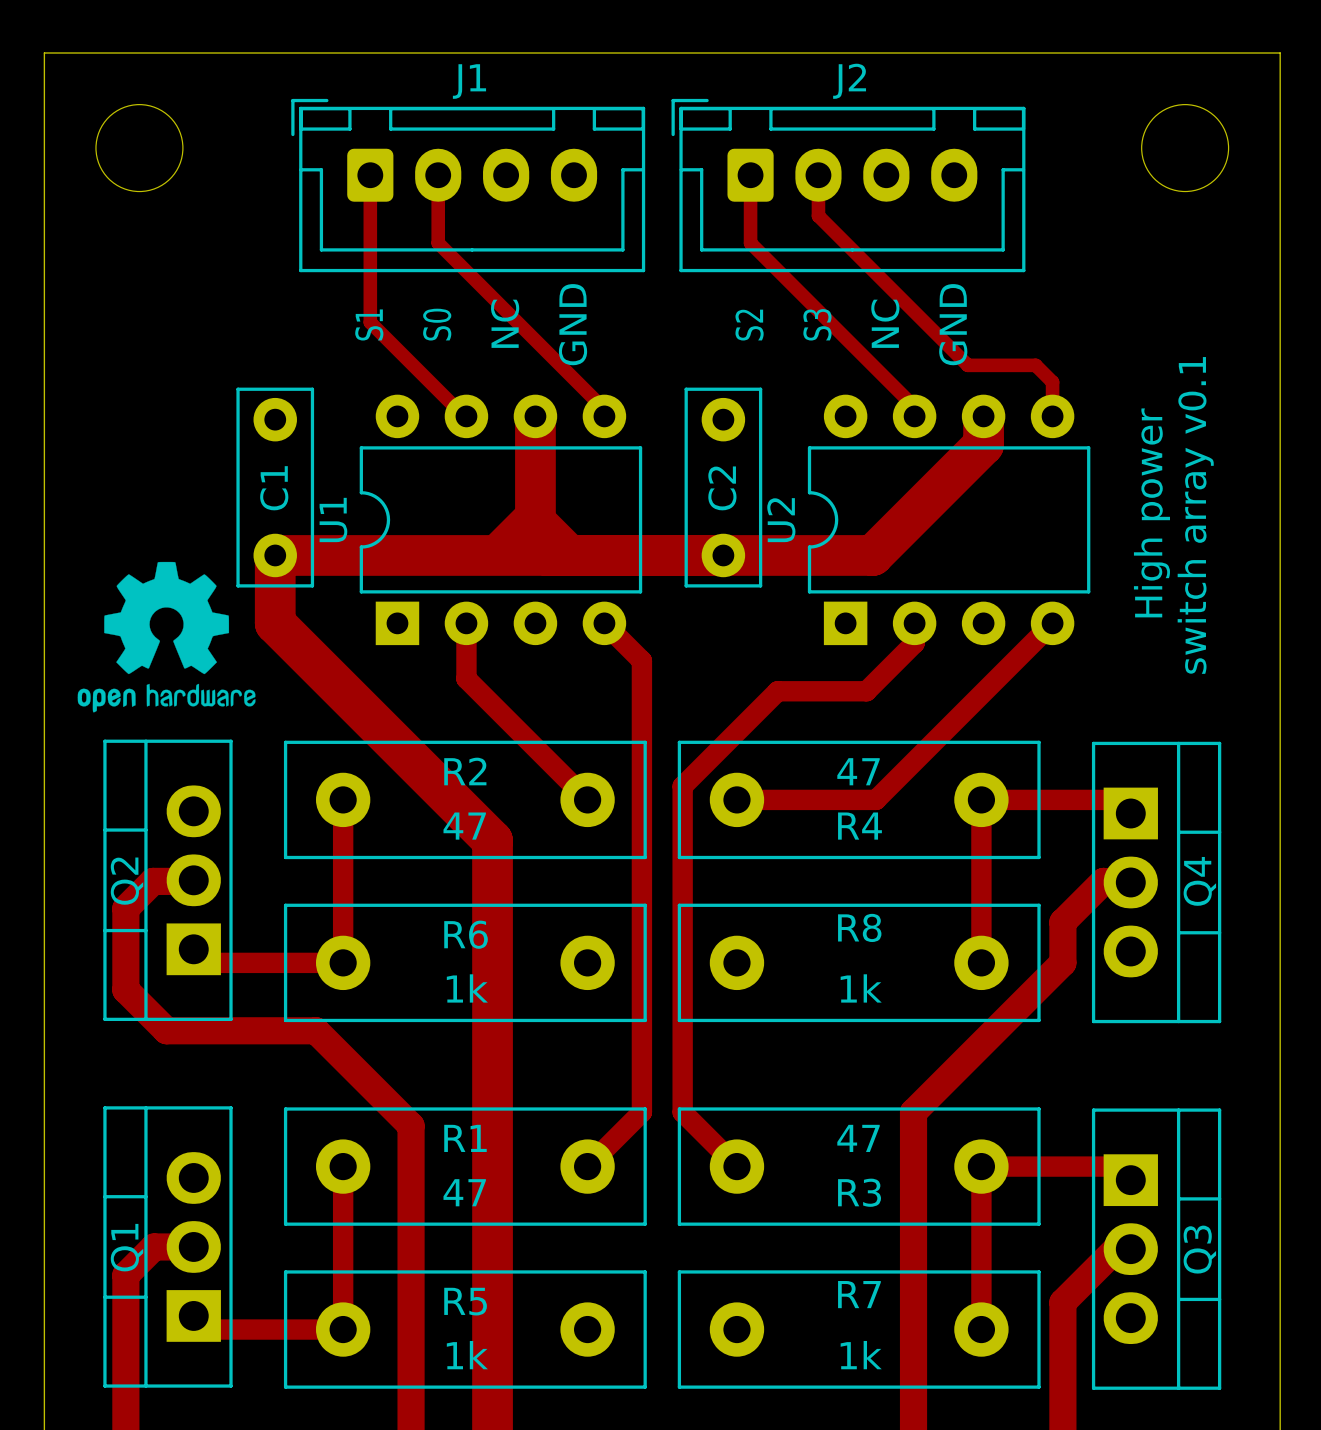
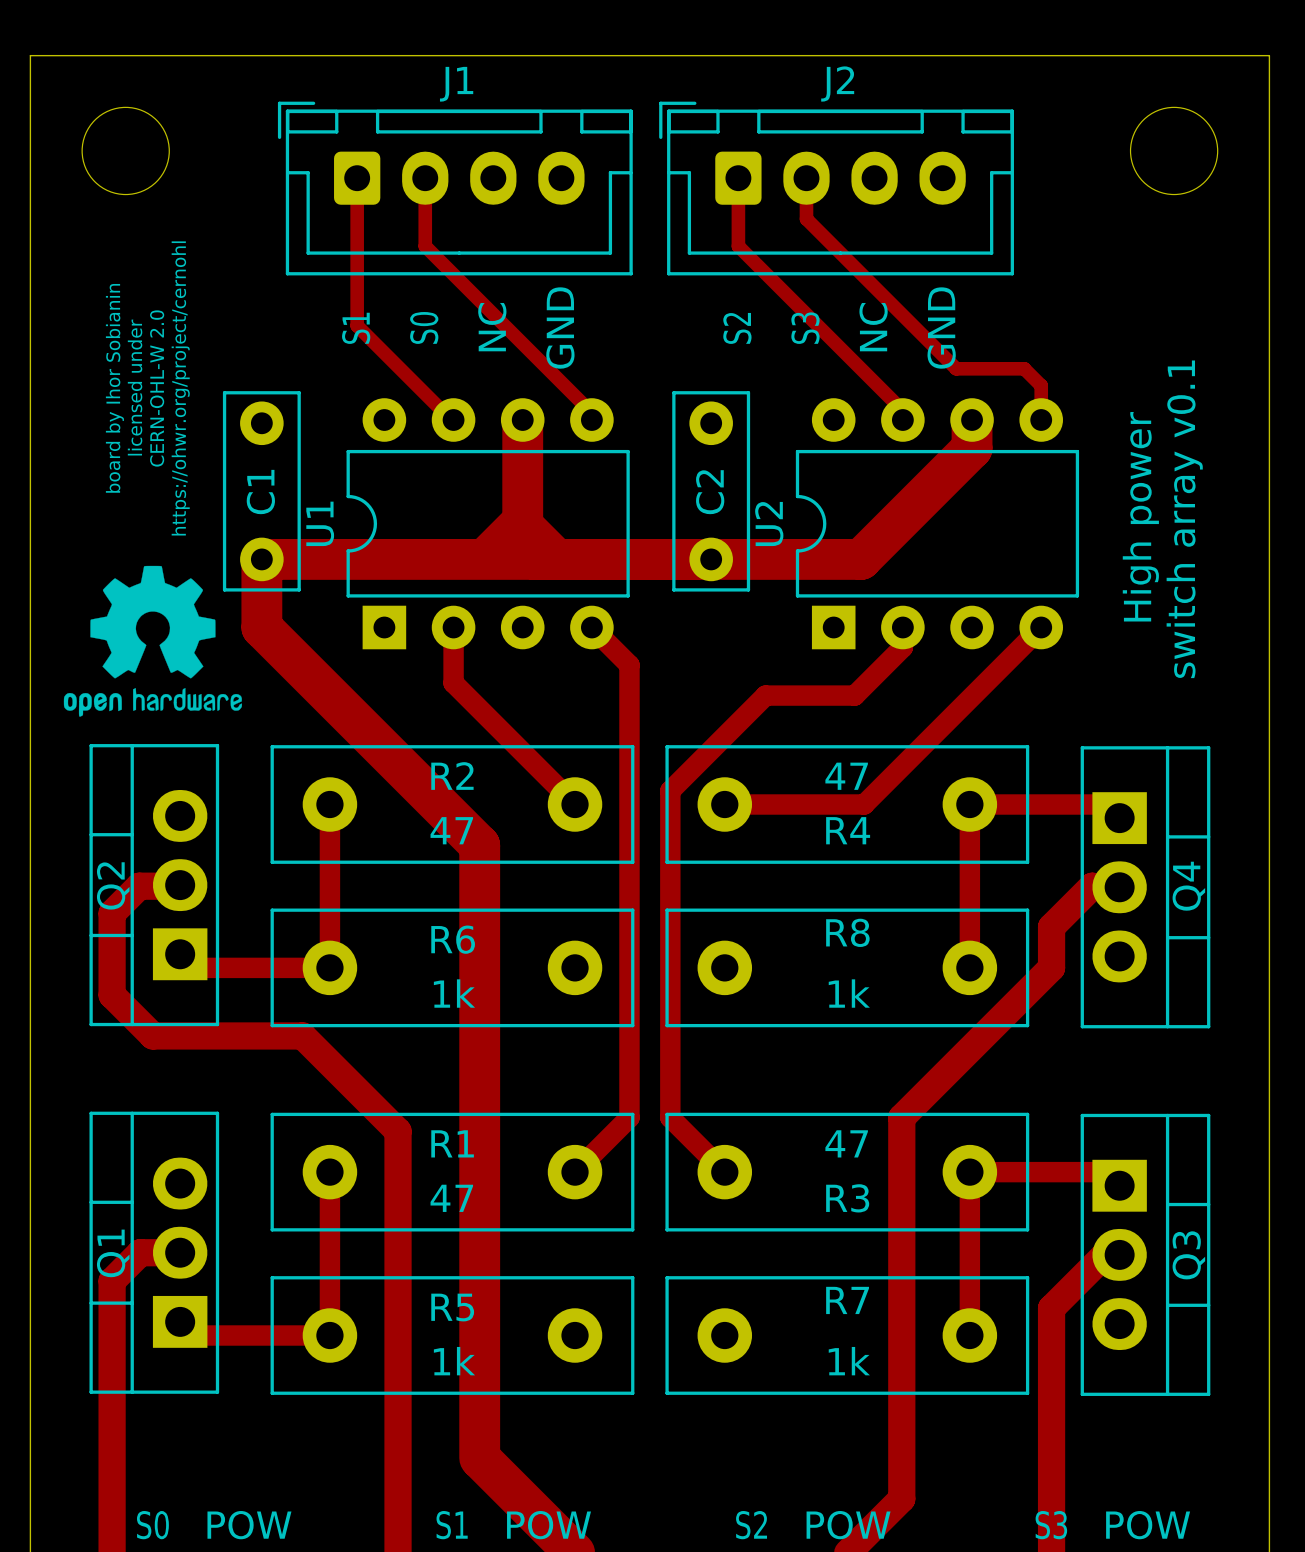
text: none -> board by Ihor Sobianin (114, 388)
text: none -> licensed under (135, 387)
text: none -> https://ohwr.org/project/cernohl (180, 388)
text: none -> CERN-OHL-W 2.0 (157, 388)

